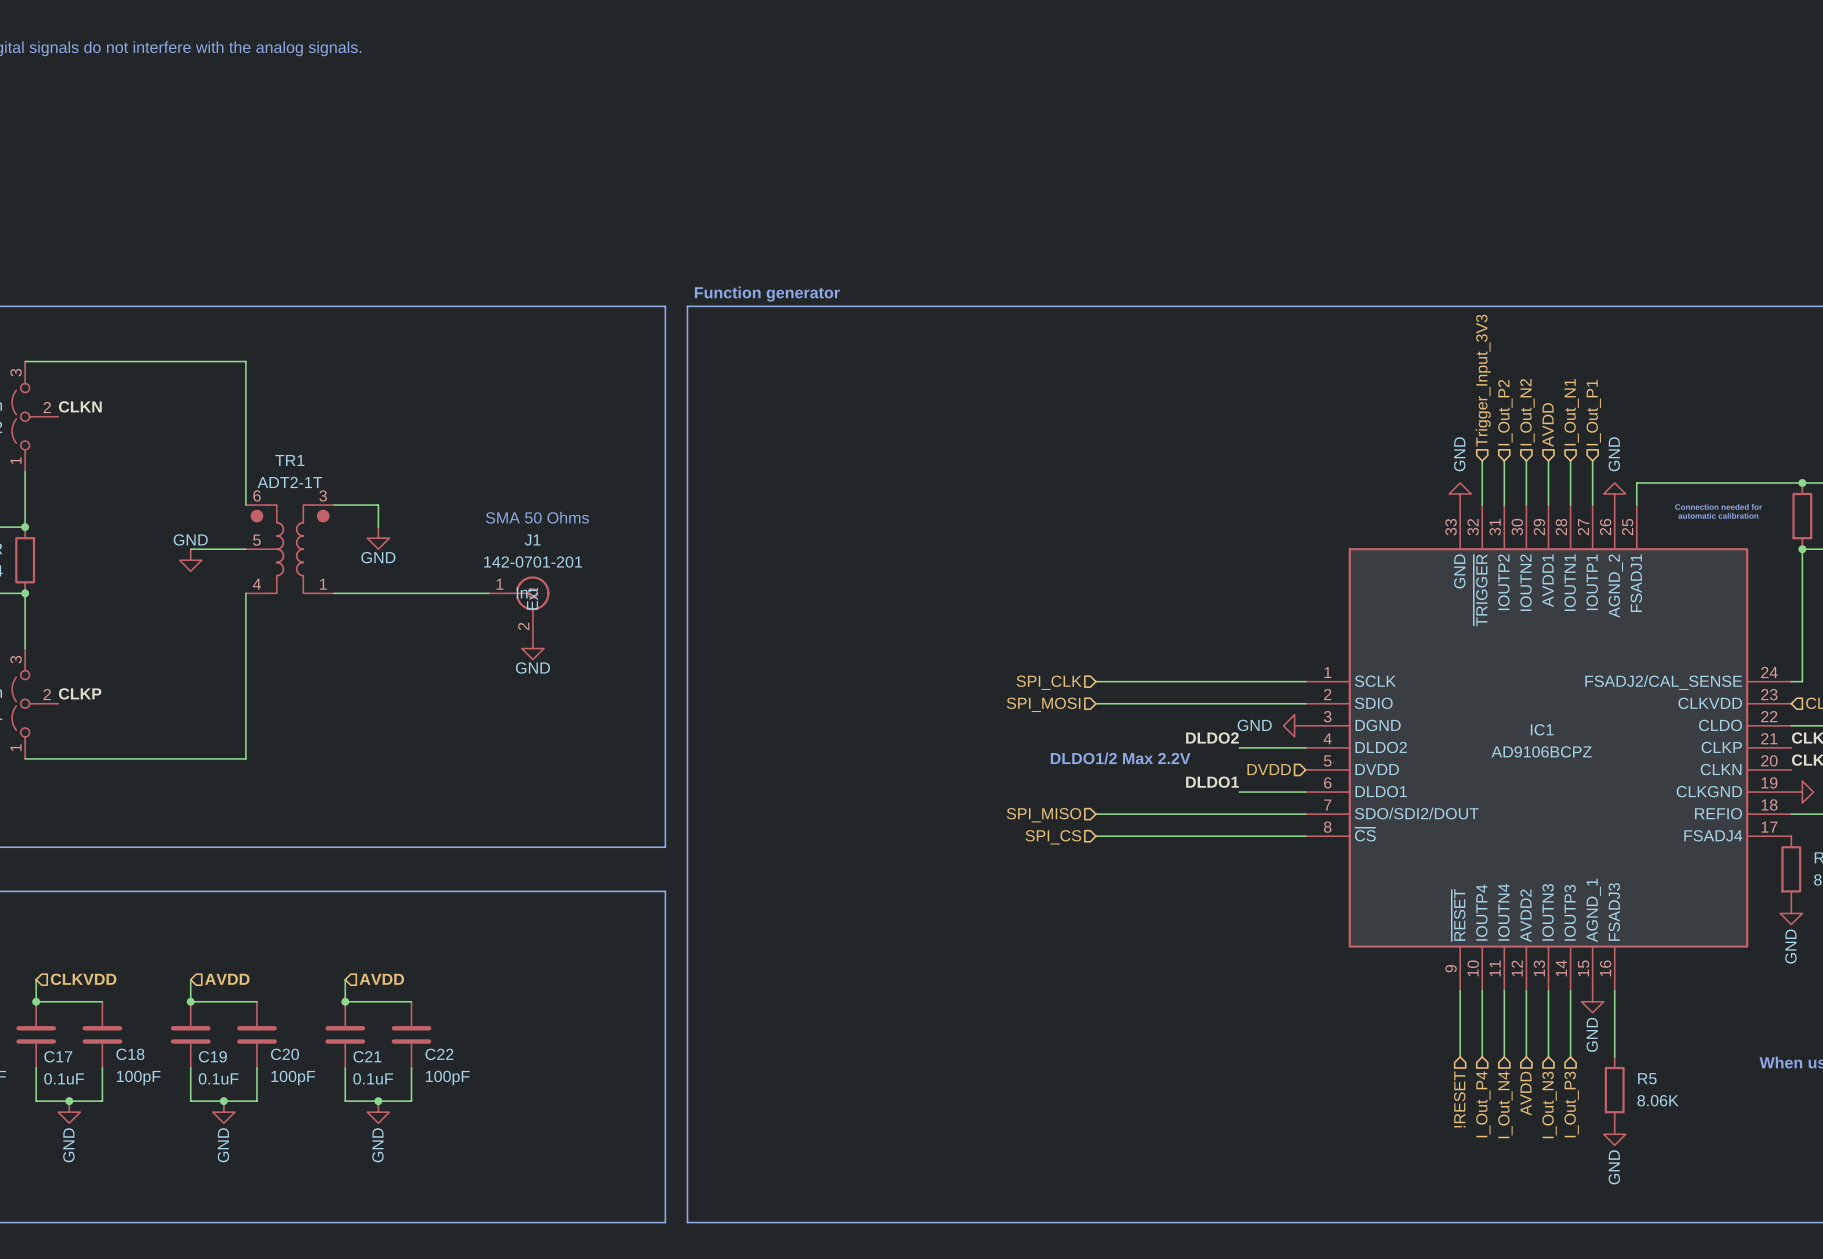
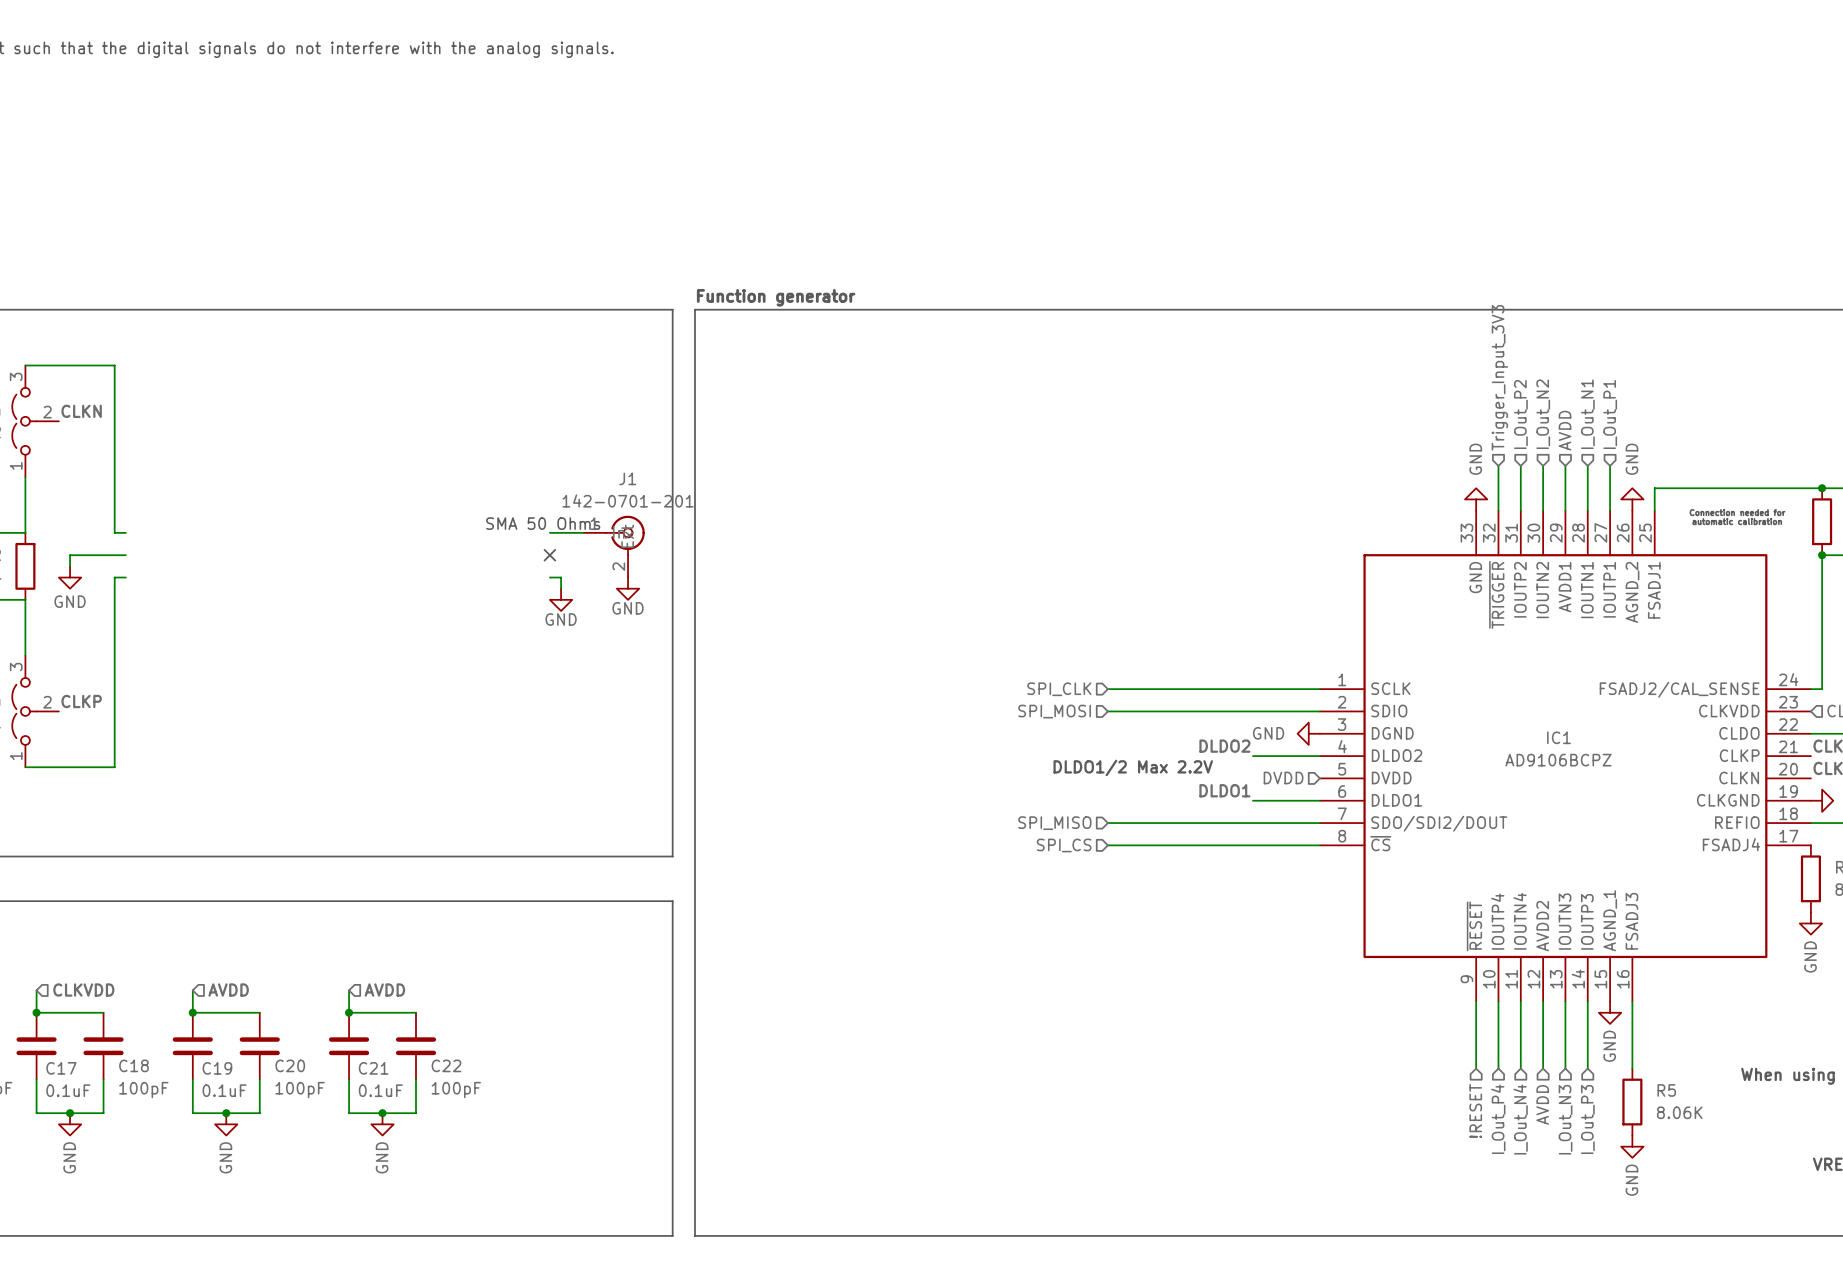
wire: (113, 361) (245, 361) (245, 505) -> (114, 365) (114, 532) (125, 532)
wire: (334, 505) (378, 505) (378, 527) -> none
junction: (25, 527) -> none
wire: none -> (549, 532) (583, 532)
power symbol: GND (378, 538) -> none
power symbol text position: GND (190, 539) -> GND (70, 601)
wire: none -> (125, 555) (70, 555) (70, 566)
wire: (190, 549) (245, 549) -> none
TR1: ADT2-1T (290, 549) -> none
no-connect mark: none -> (549, 555)
power symbol position: GND (190, 560) -> GND (70, 577)
wire: none -> (549, 577) (561, 577) (561, 588)
power symbol: none -> GND (628, 588)
junction: (25, 593) -> none
wire: (245, 593) (245, 758) (113, 758) -> (125, 577) (114, 577) (114, 767)
wire: (334, 593) (488, 593) -> none
power symbol: none -> GND (561, 599)
J1 position: (519, 606) -> (614, 546)
power symbol: GND (532, 648) -> none

